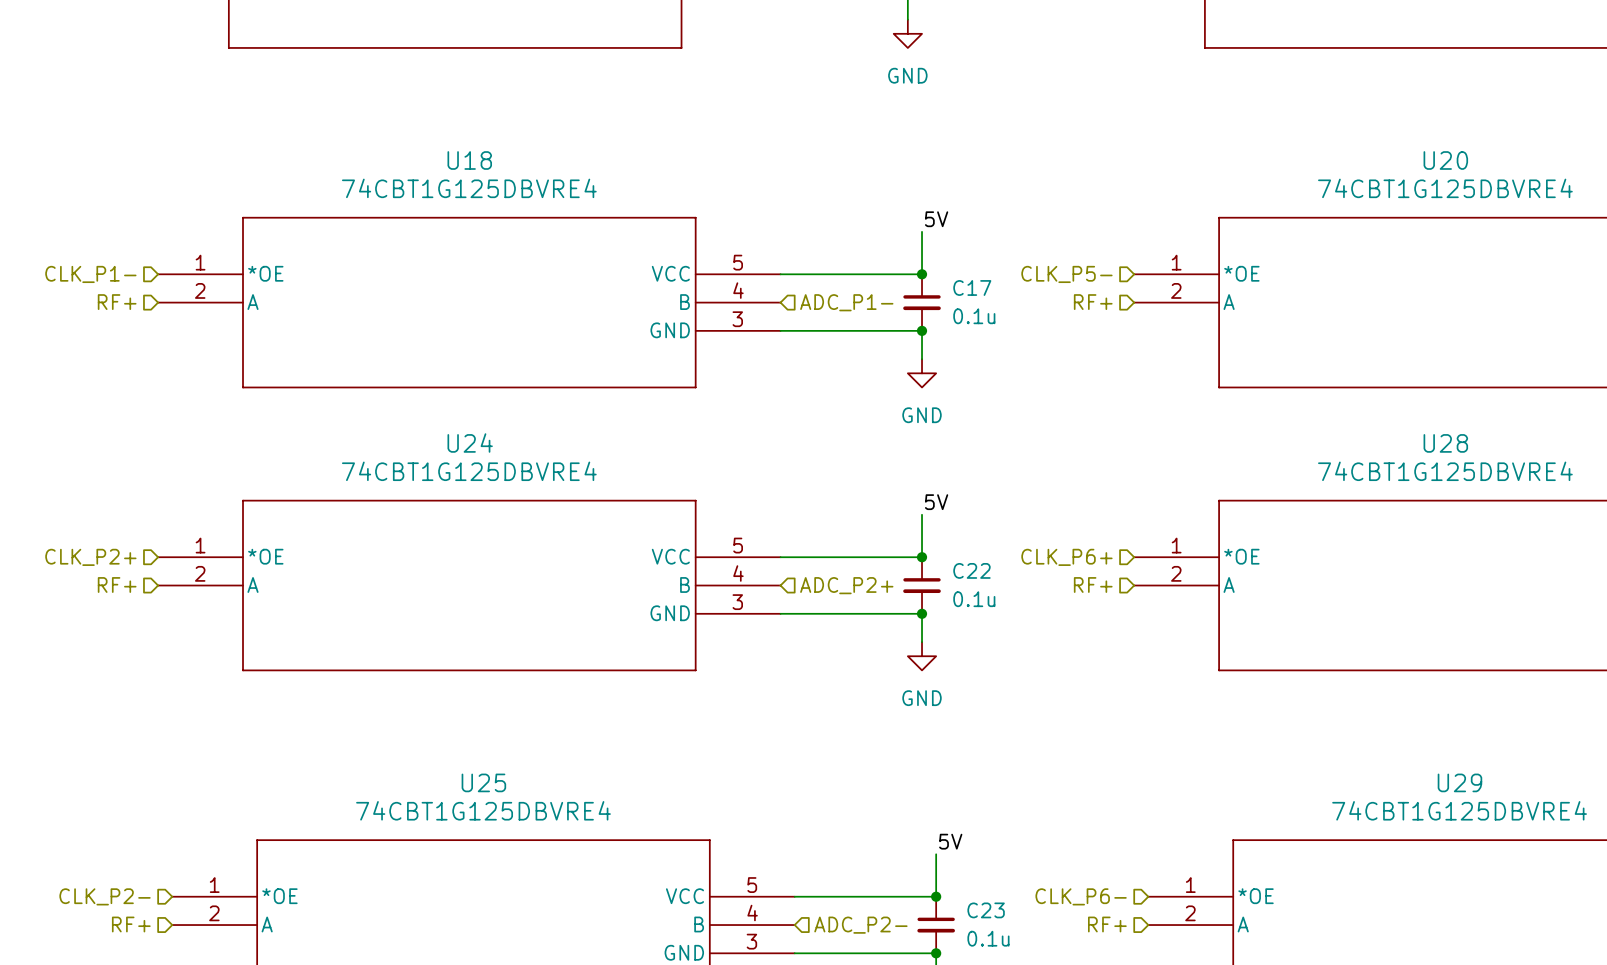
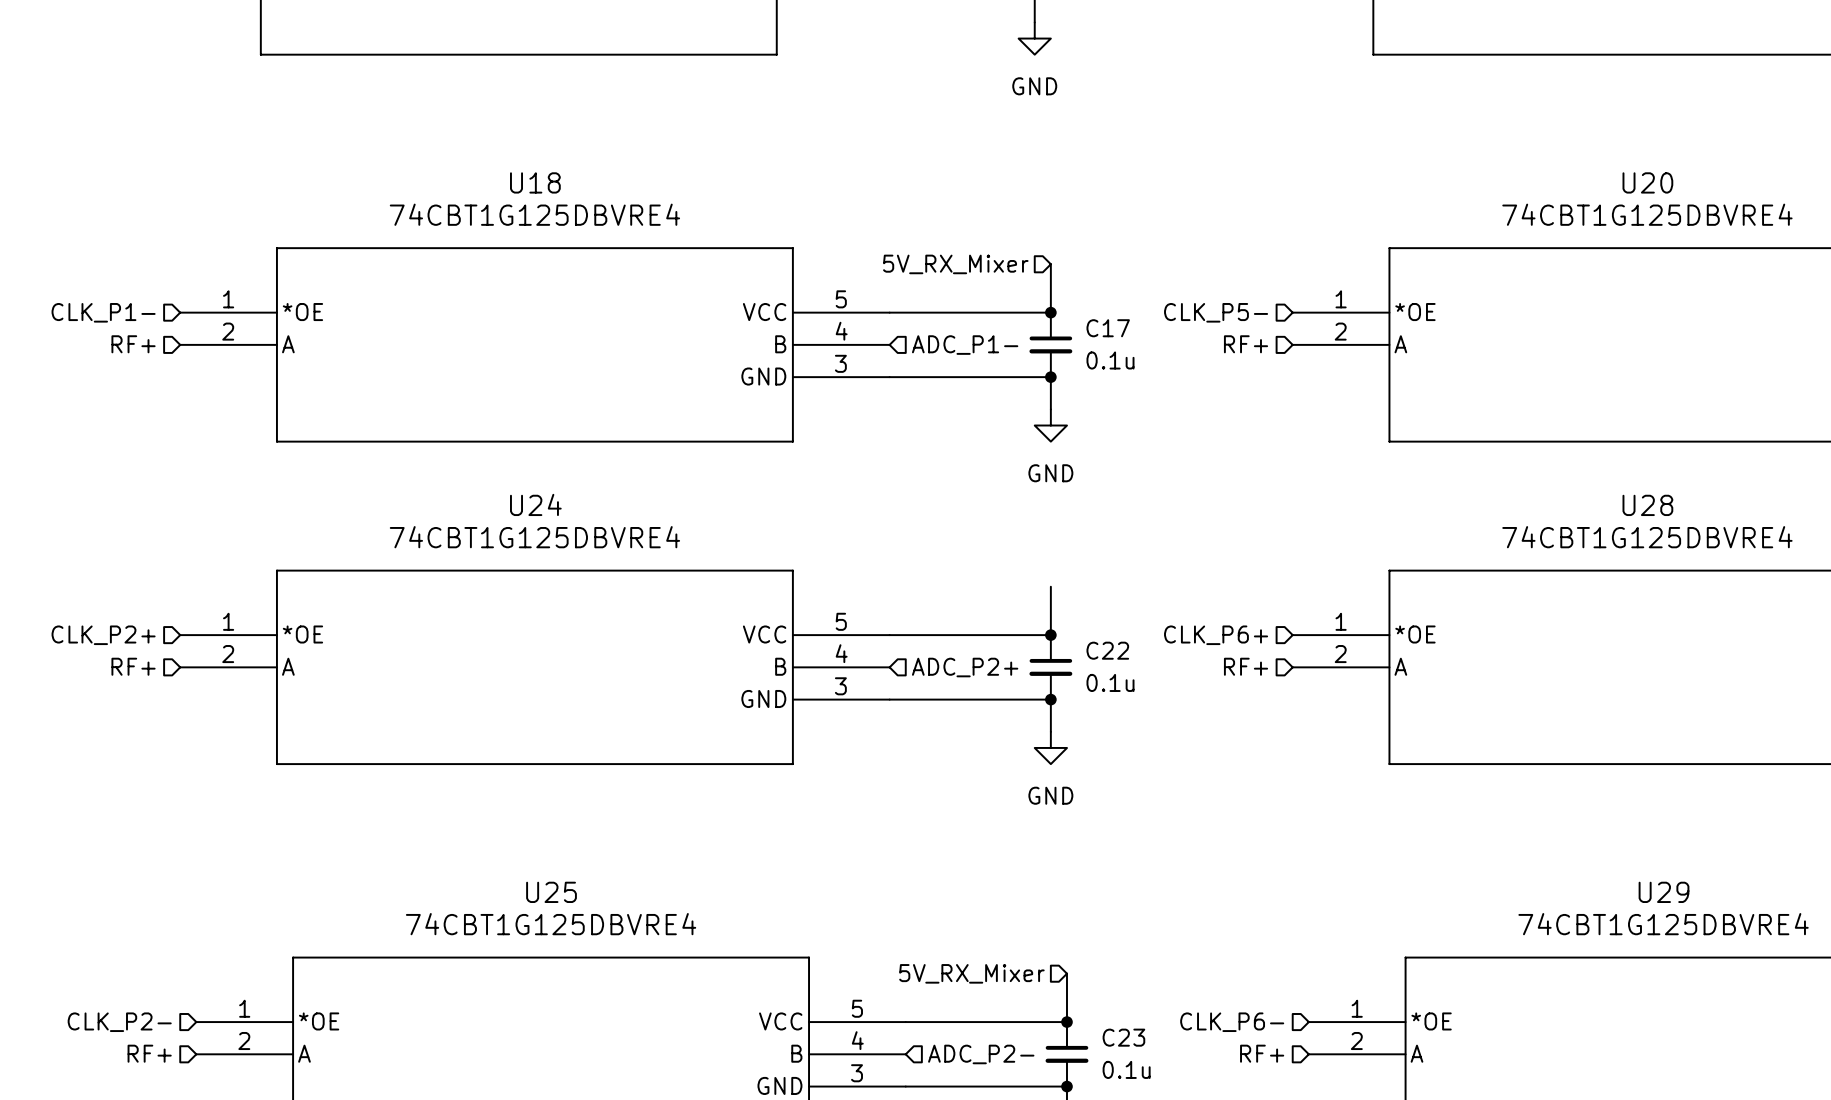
label: 5V (936, 219) -> none
hierarchical label: none -> 5V_RX_Mixer (955, 264)
label: 5V (936, 502) -> none
label: 5V (950, 841) -> none
hierarchical label: none -> 5V_RX_Mixer (971, 973)

